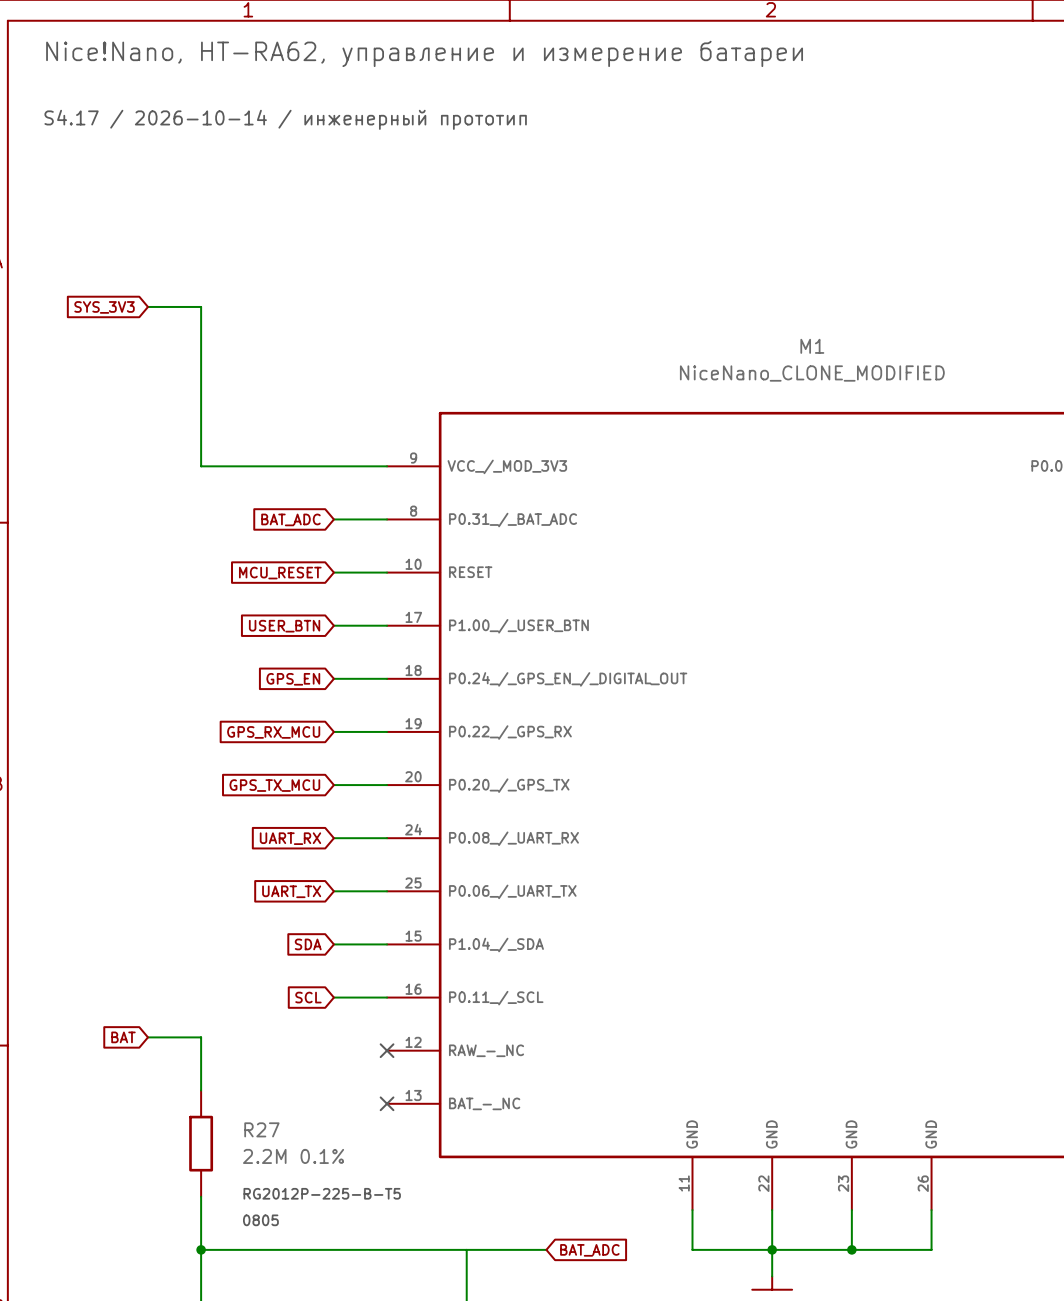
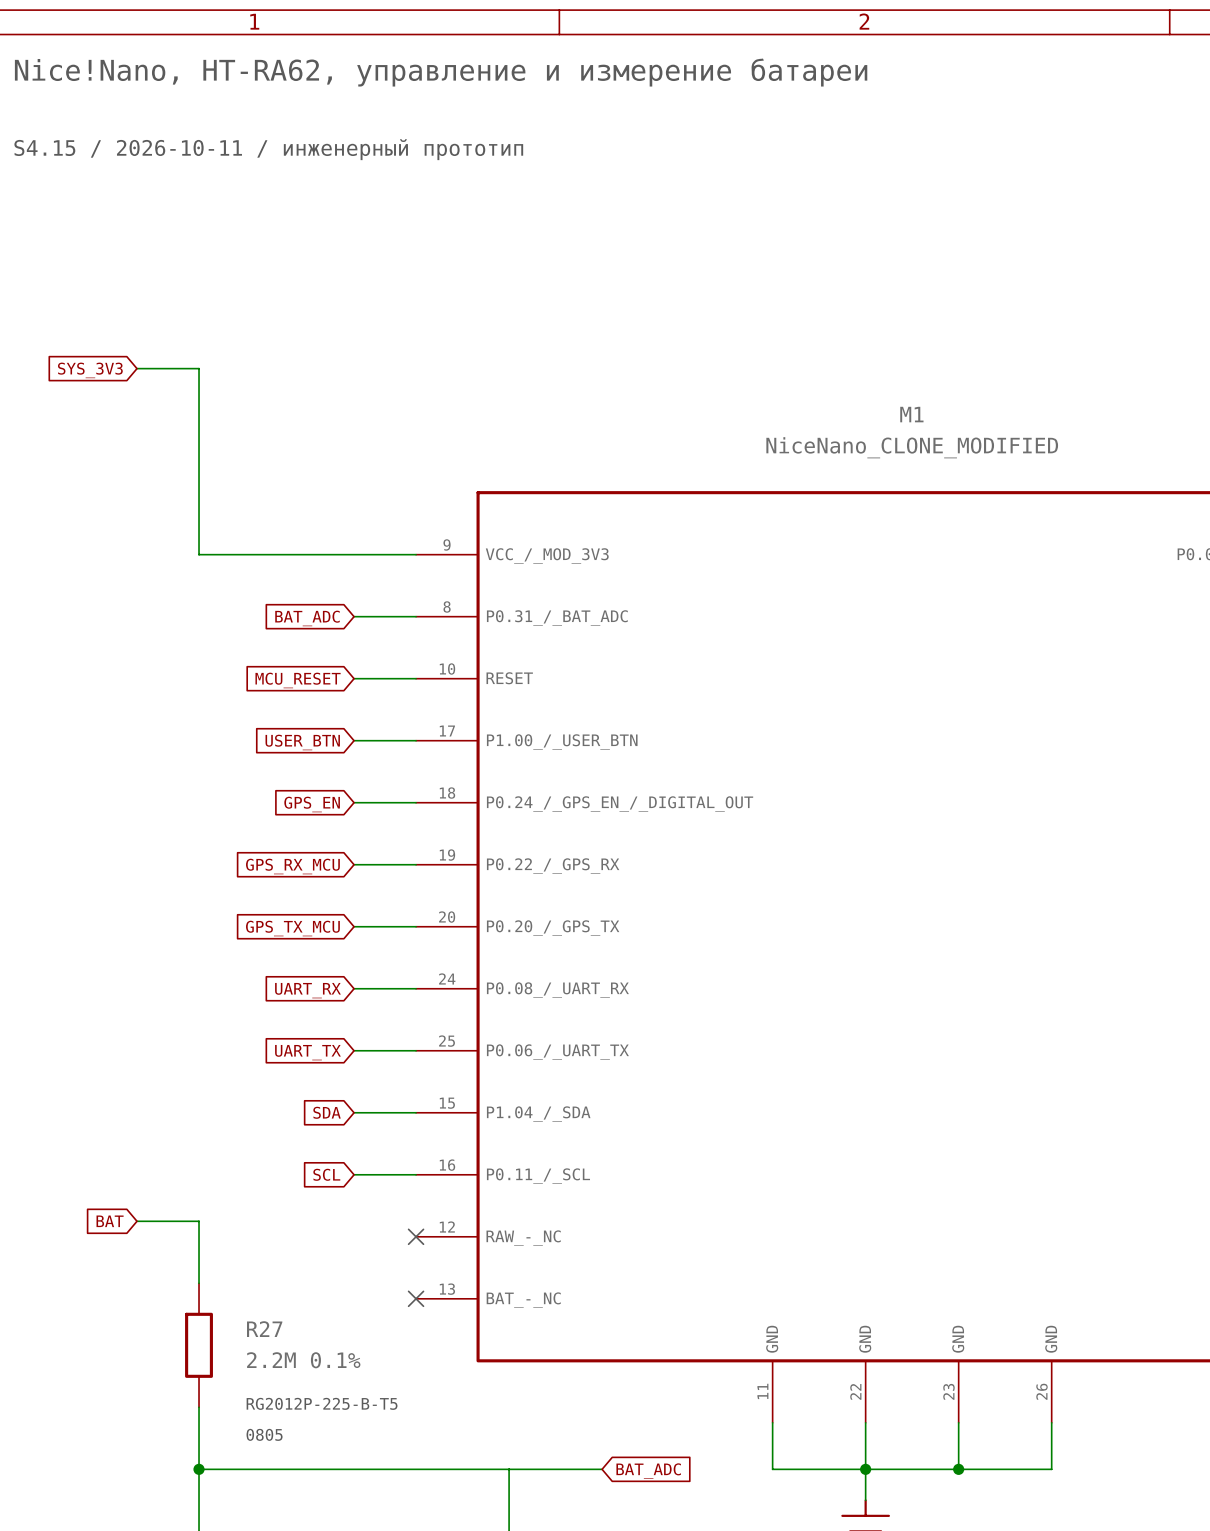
text: S4.17 / 2026-10-14 / инженерный прототип (285, 119) -> S4.15 / 2026-10-11 / инженерный прототип (268, 149)

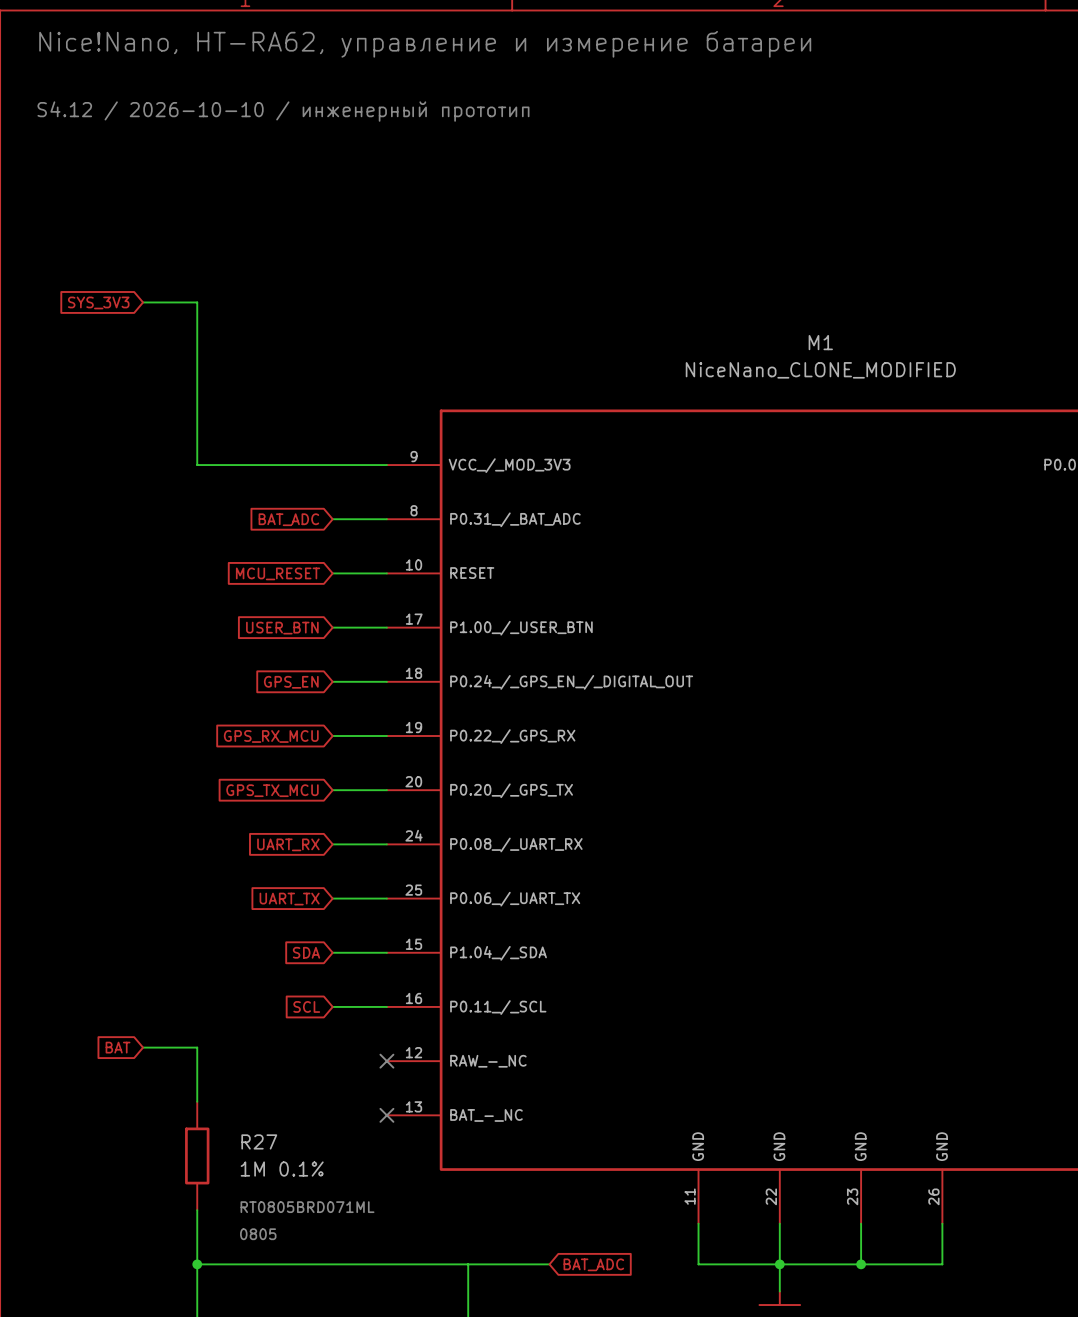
text: S4.15 / 2026-10-11 / инженерный прототип (268, 149) -> S4.12 / 2026-10-10 / инженерный прототип (283, 111)
R27 value: 2.2M 0.1% (303, 1360) -> 1M 0.1% (282, 1169)
text: RG2012P-225-B-T5 (322, 1403) -> RT0805BRD071ML (307, 1207)

